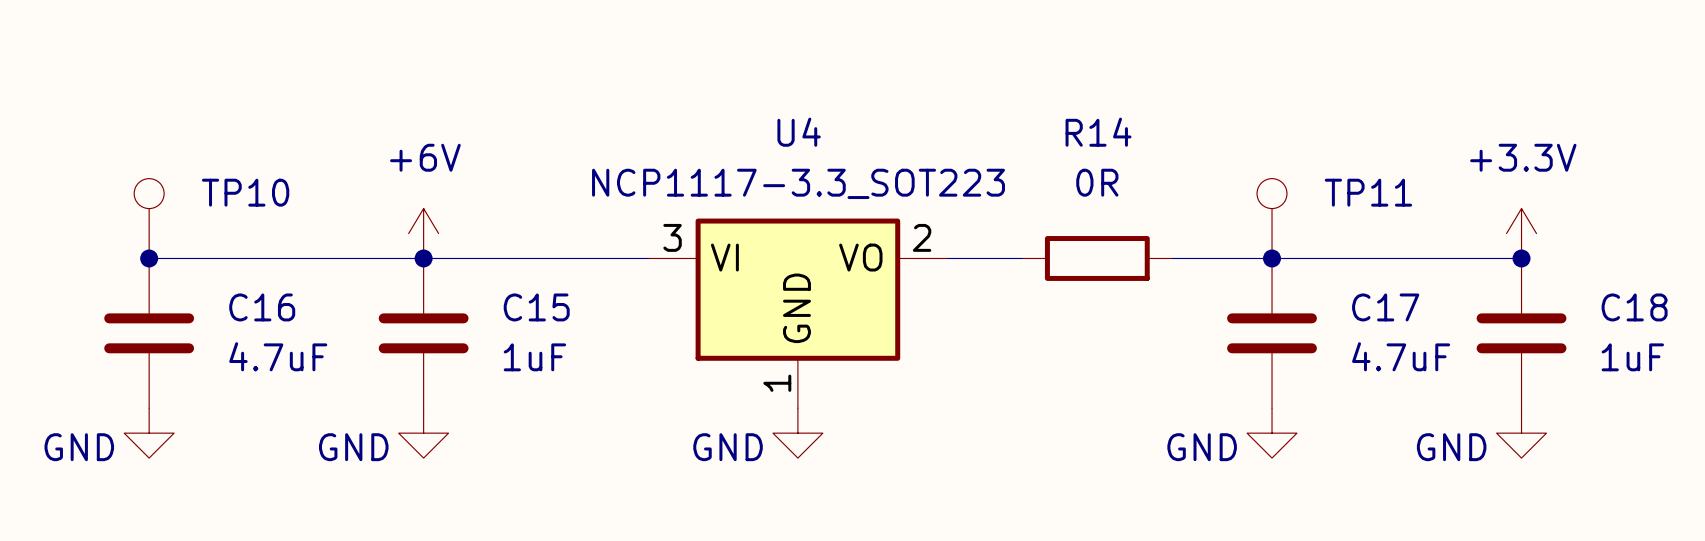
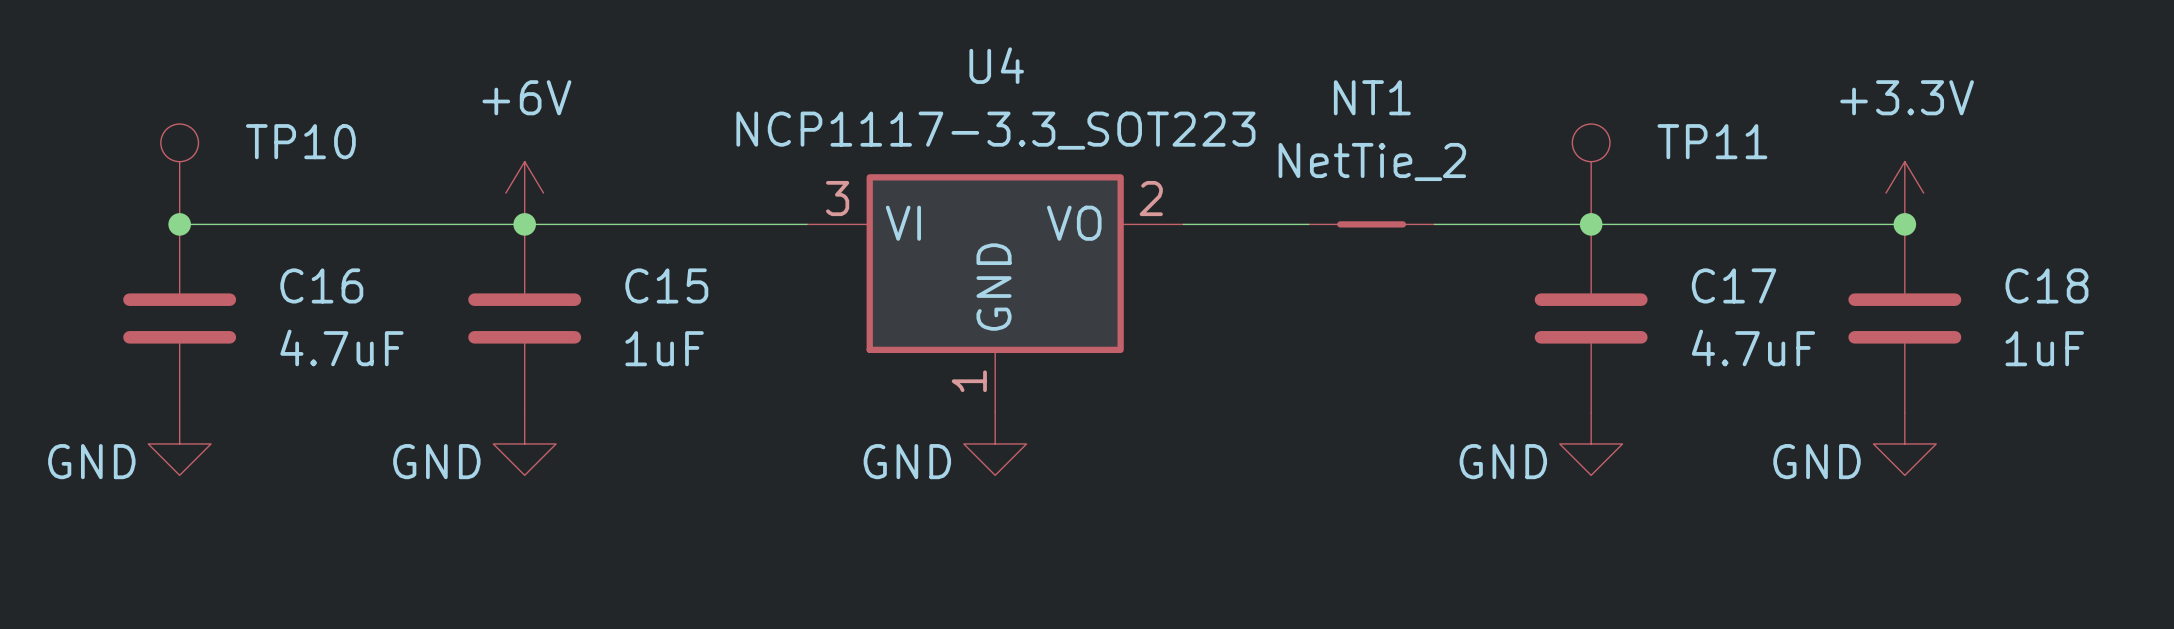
R14: 0R (1097, 258) -> none
NT1: none -> NetTie_2 (1371, 224)

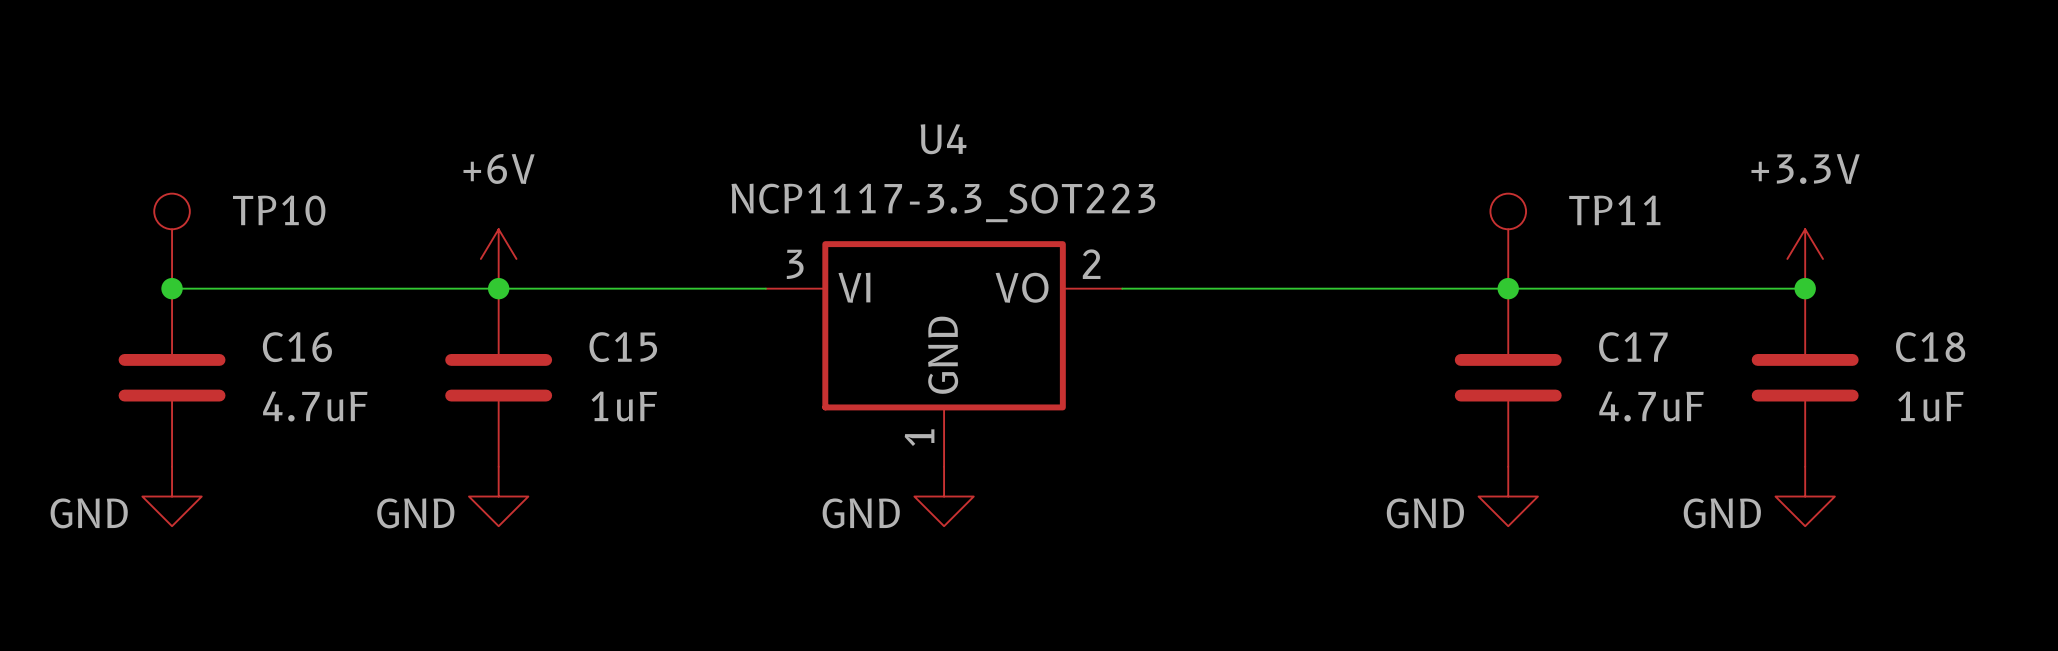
NT1: NetTie_2 (1371, 224) -> none

